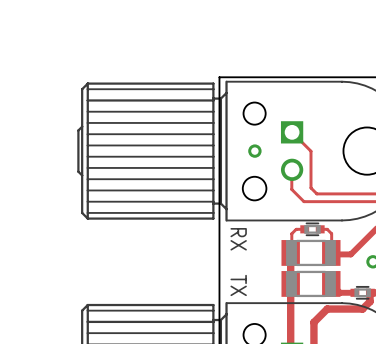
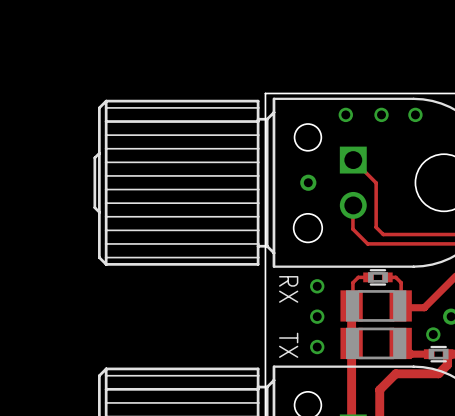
via: none -> (345, 114)
via: none -> (381, 114)
via: none -> (415, 114)
via: none -> (317, 286)
via: none -> (317, 316)
via: none -> (433, 334)
via: none -> (317, 347)

